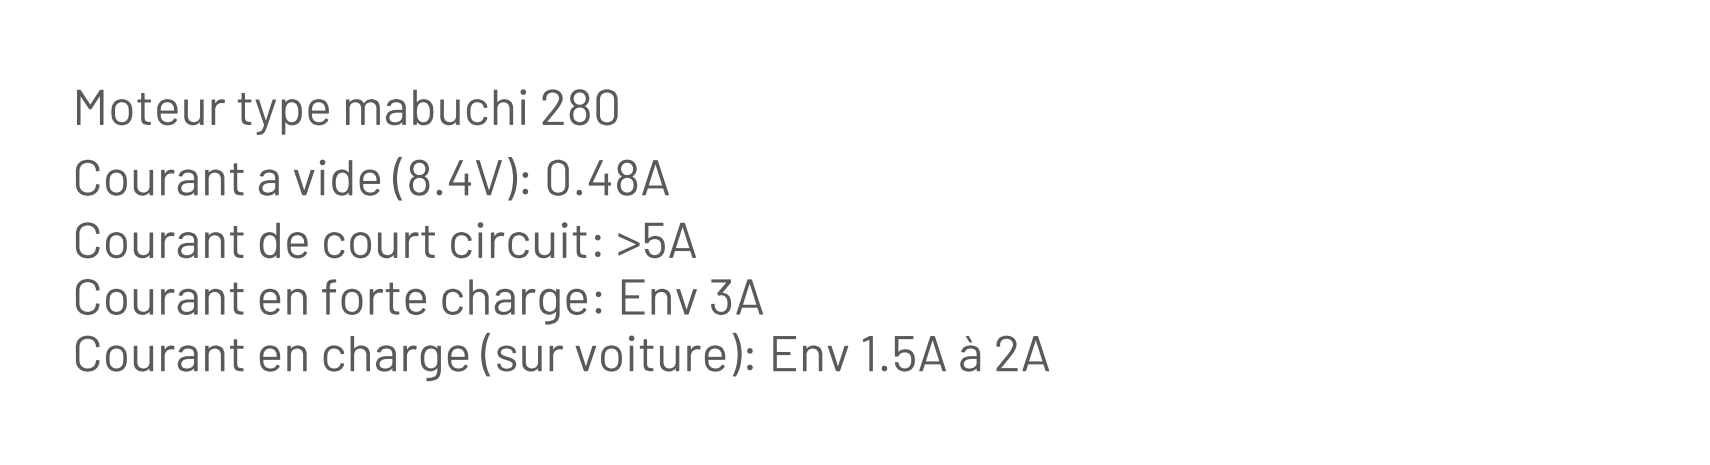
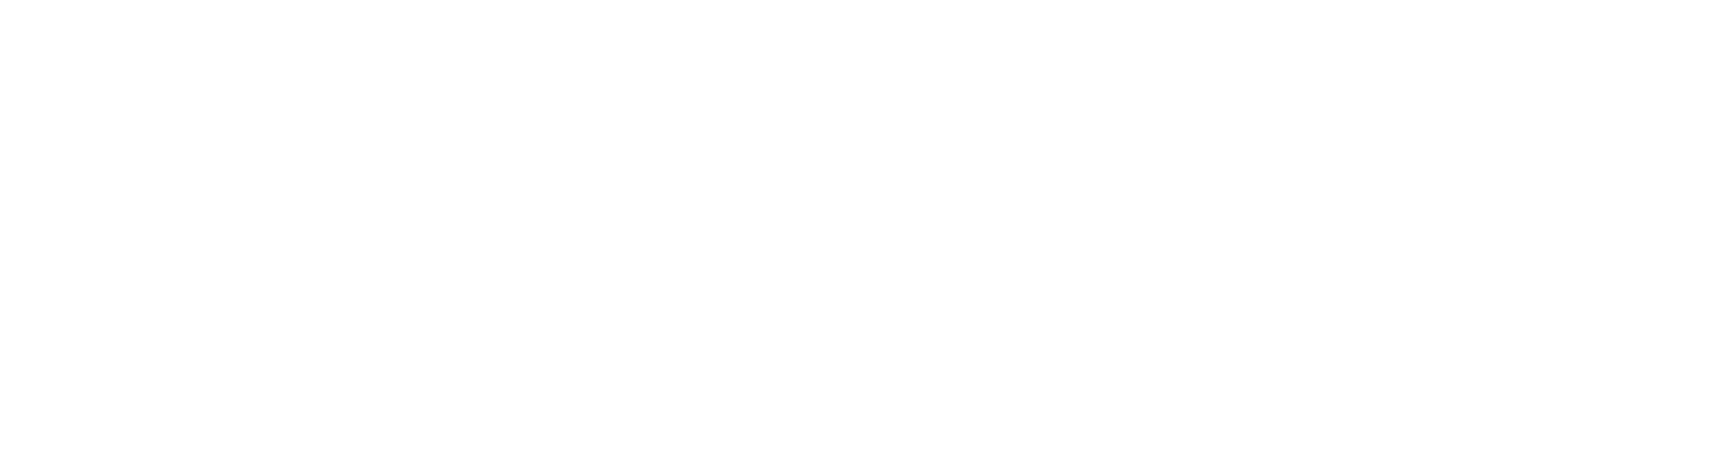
text: Moteur type mabuchi 280 (347, 112) -> none
text: Courant a vide (8.4V): 0.48A (372, 178) -> none
text: Courant de court circuit: >5A (386, 240) -> none
text: Courant en forte charge: Env 3A (419, 301) -> none
text: Courant en charge (sur voiture): Env 1.5A à 2A (562, 357) -> none

